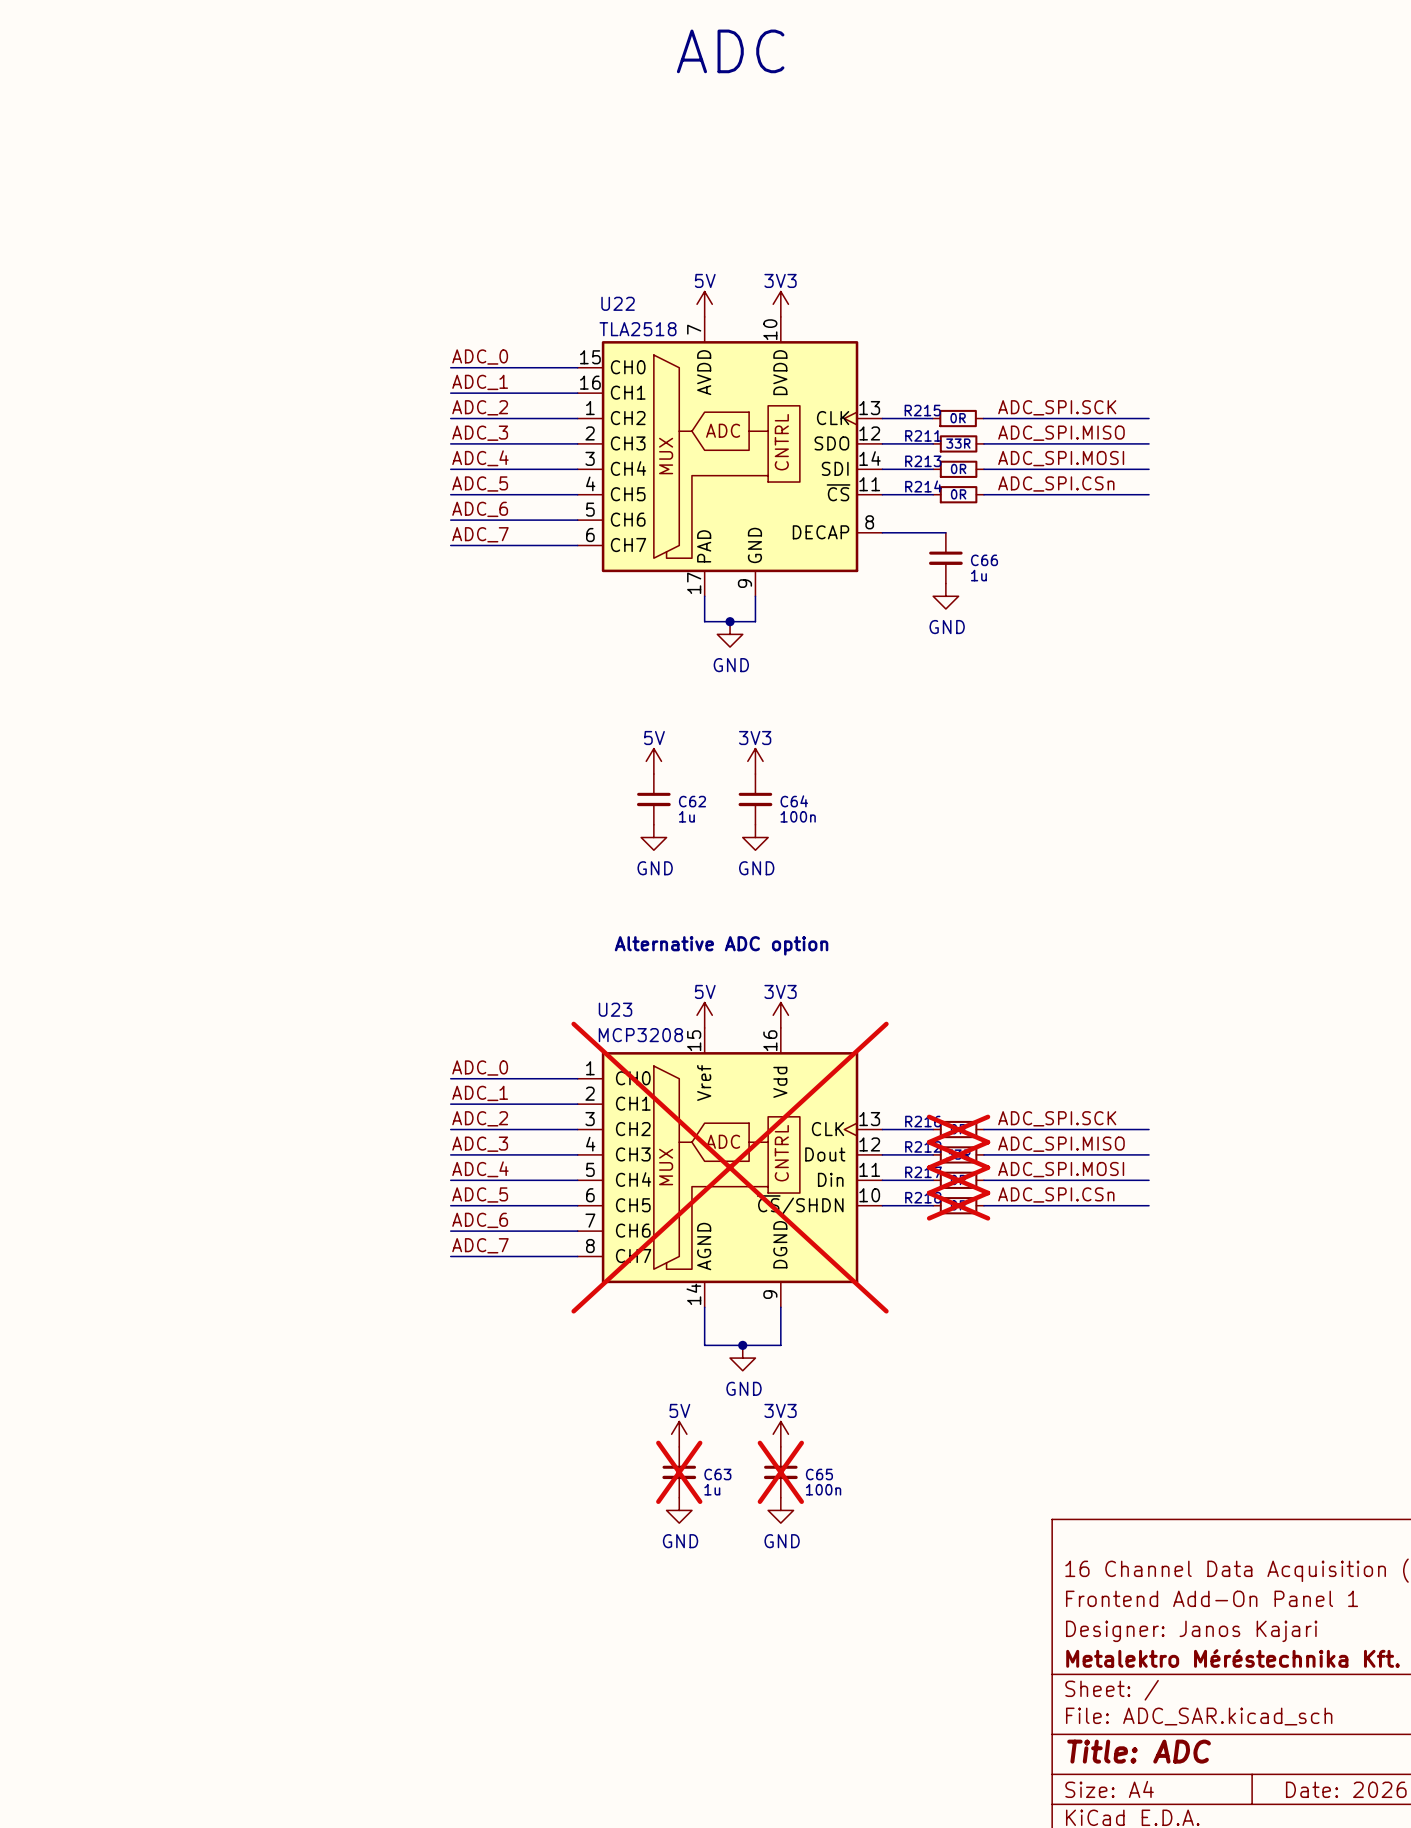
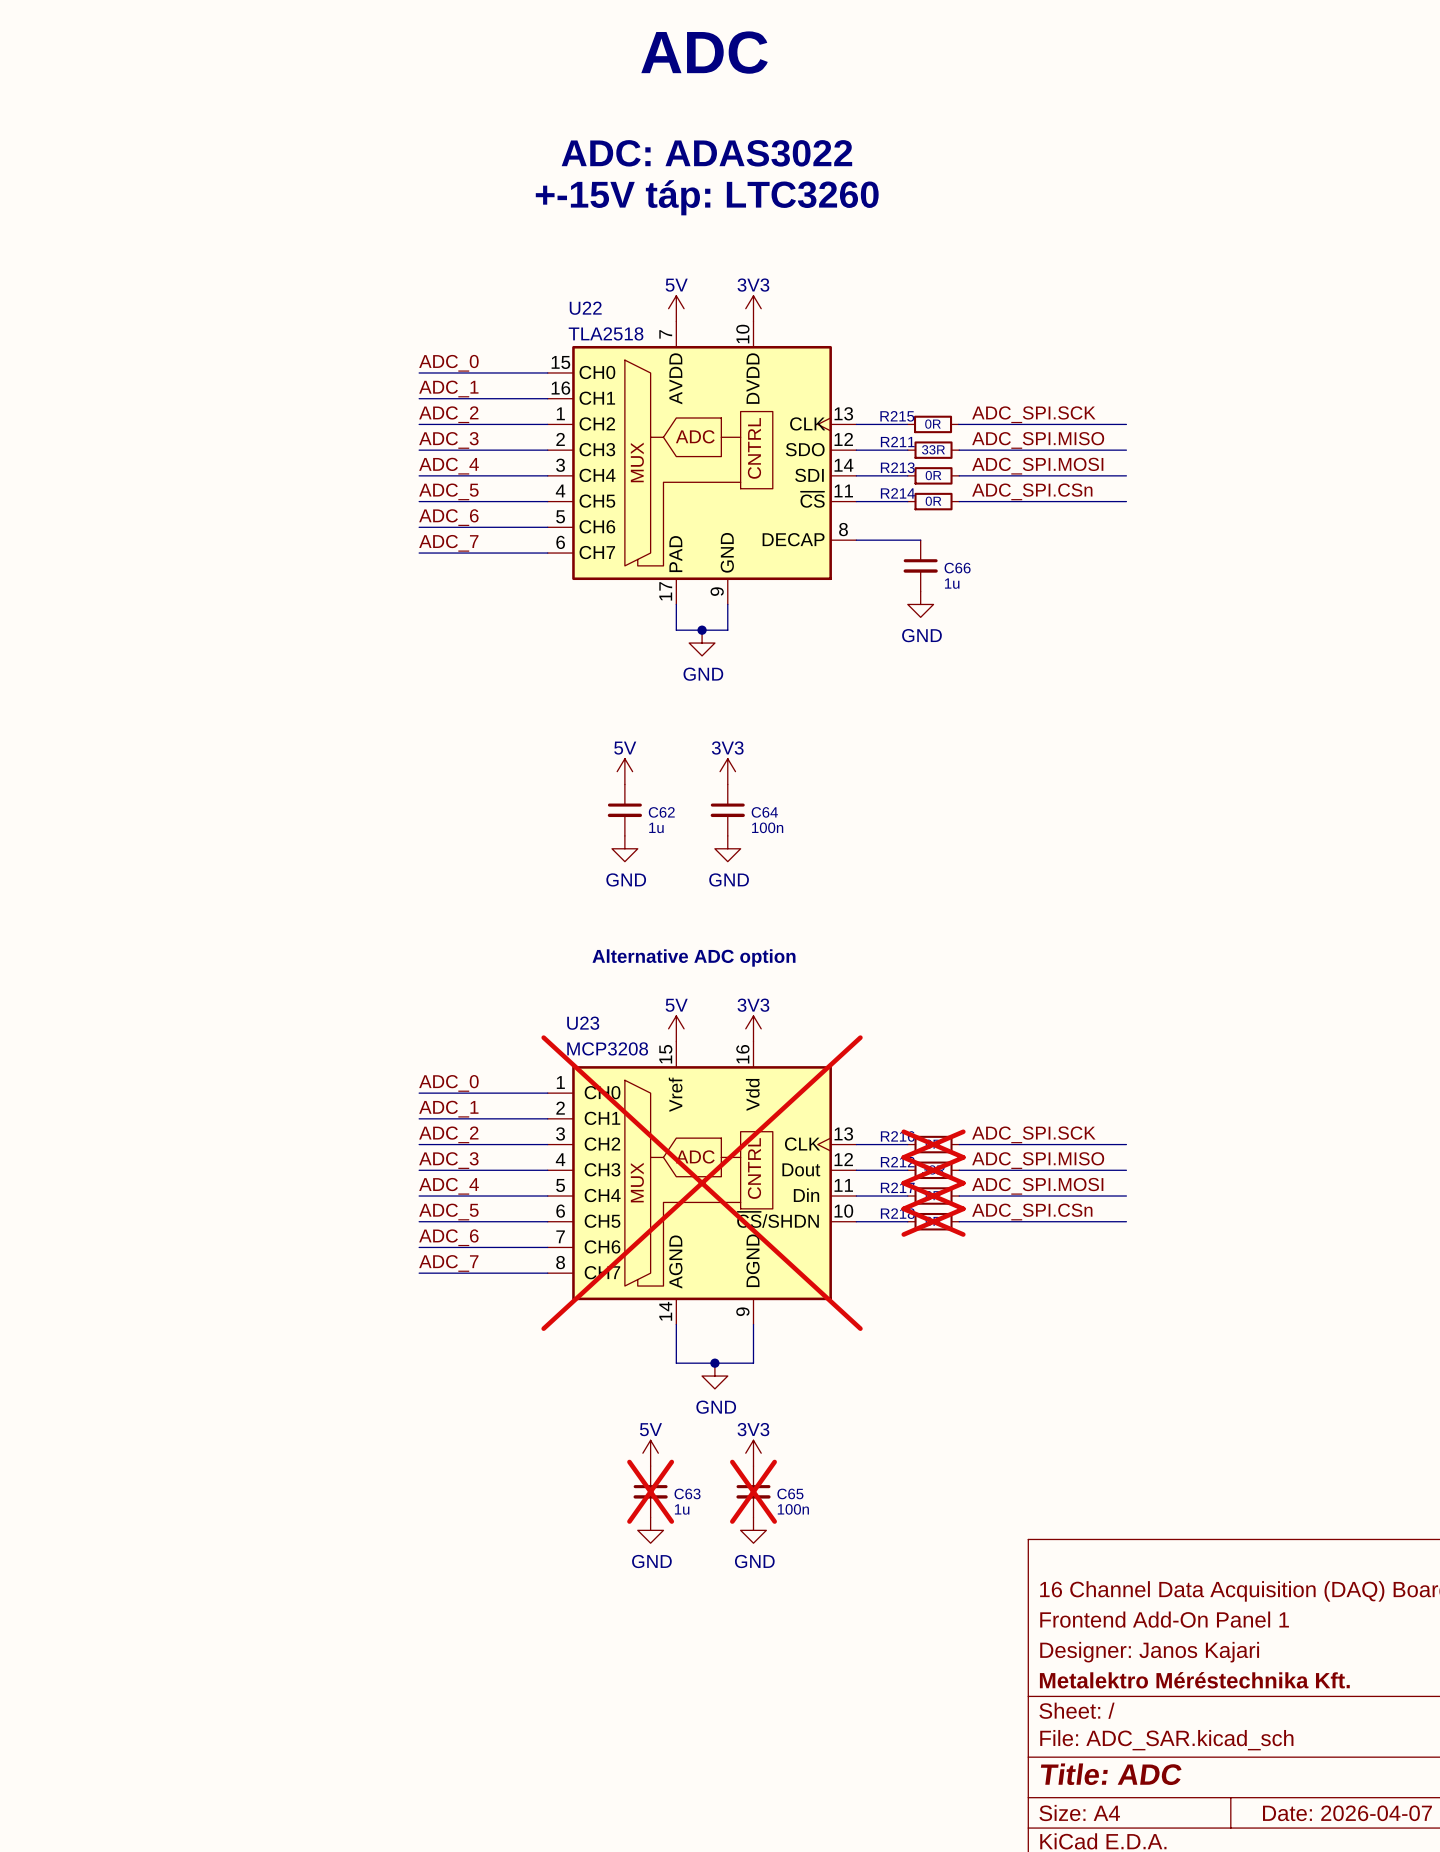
text: none -> ADC: ADAS3022 (706, 153)
text: none -> +-15V táp: LTC3260 (707, 197)

